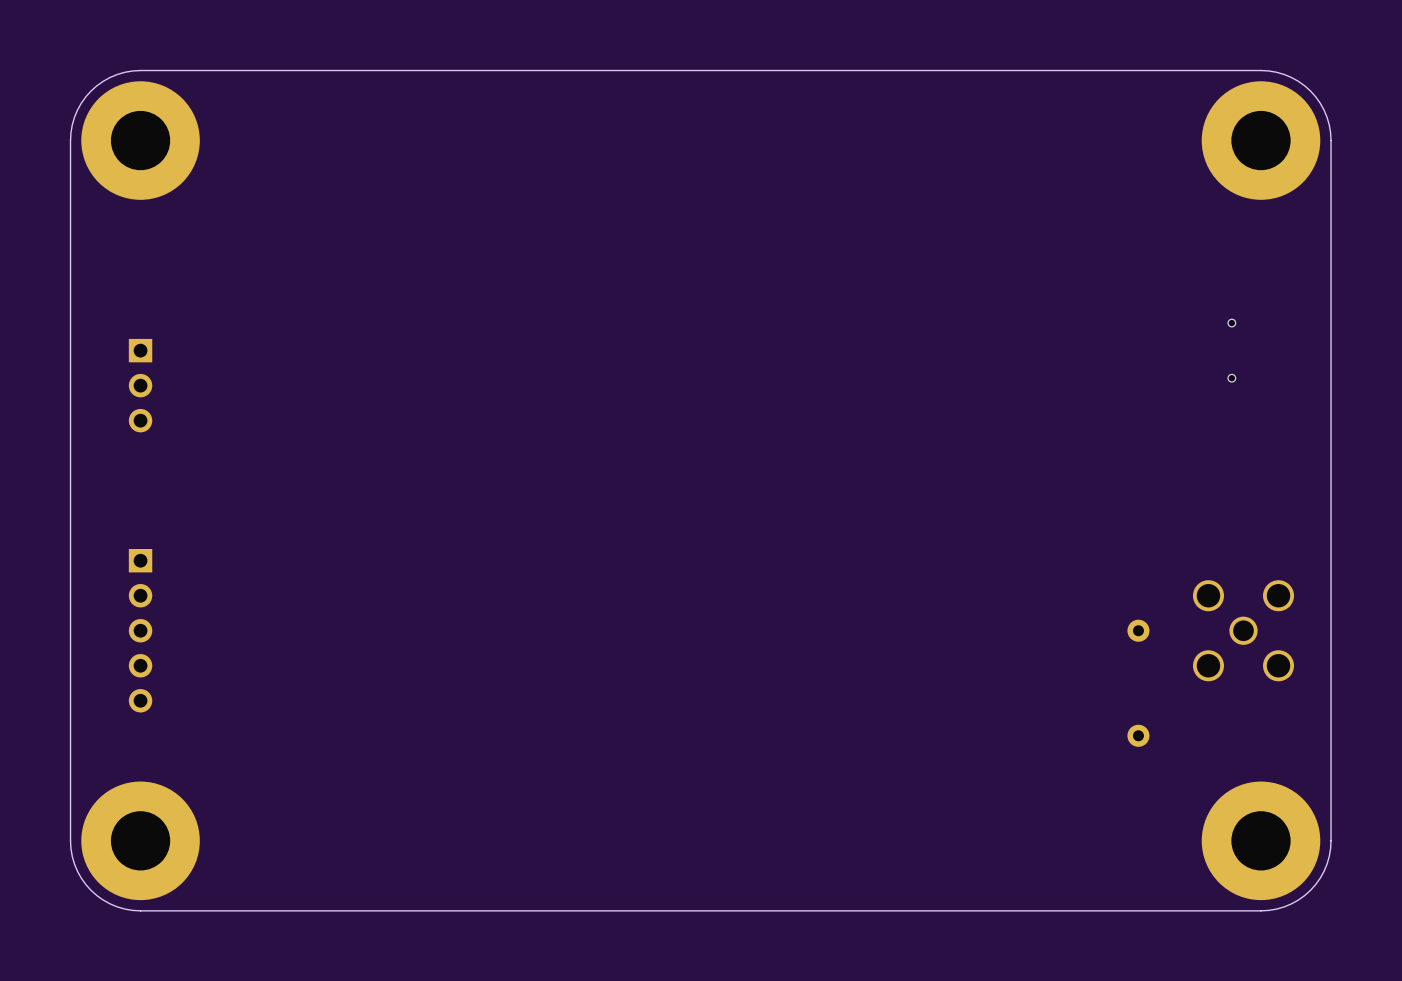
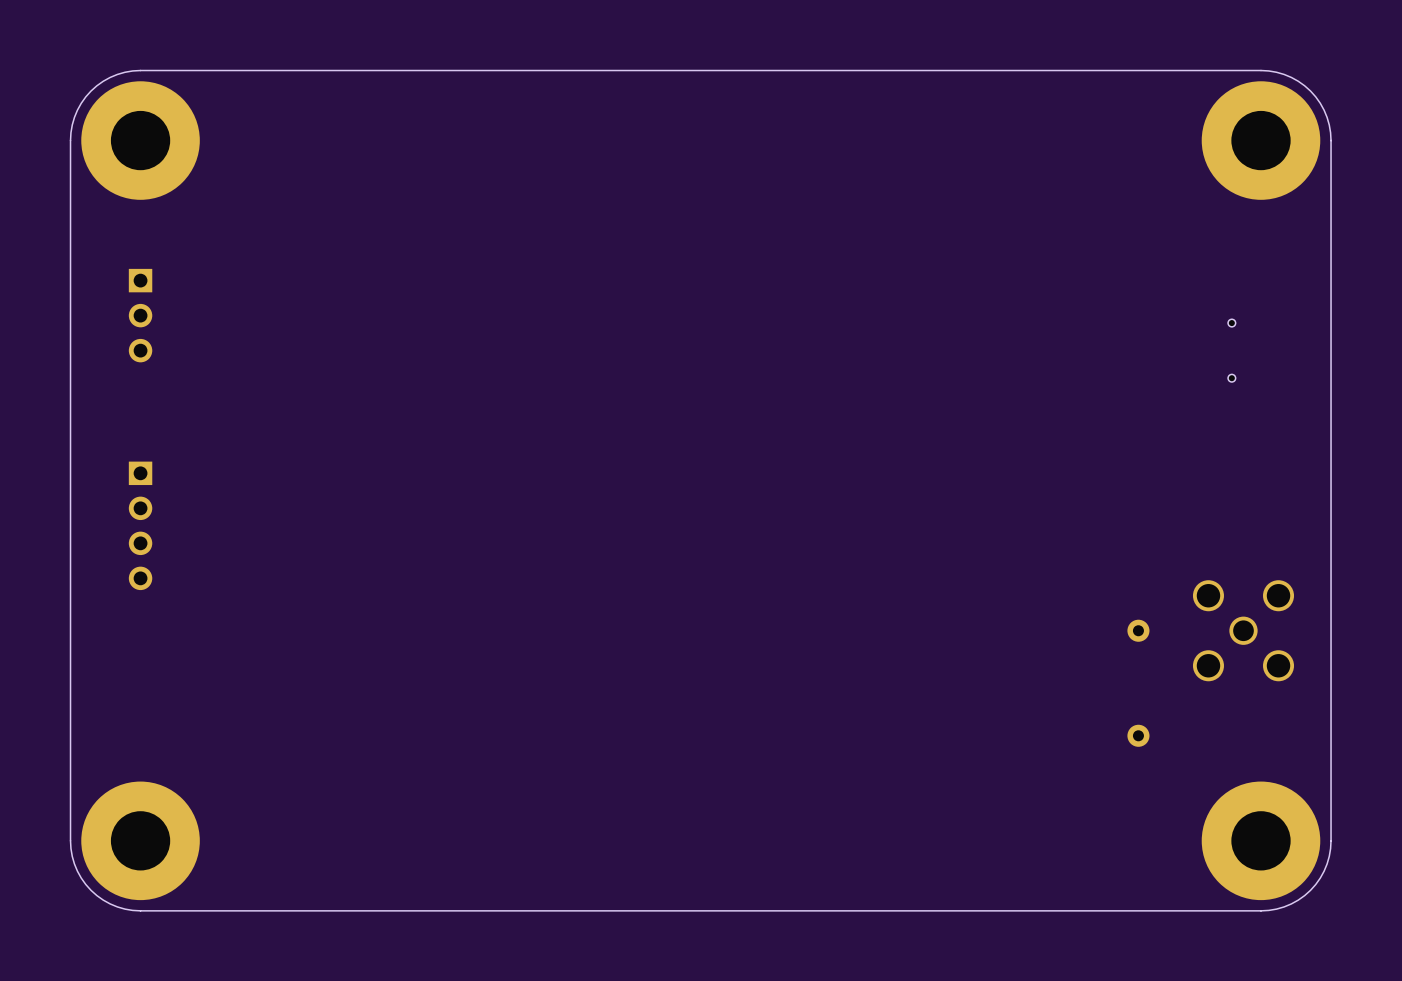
part position: (140, 385) -> (140, 315)
part: none -> (140, 525)
part: (140, 630) -> none

